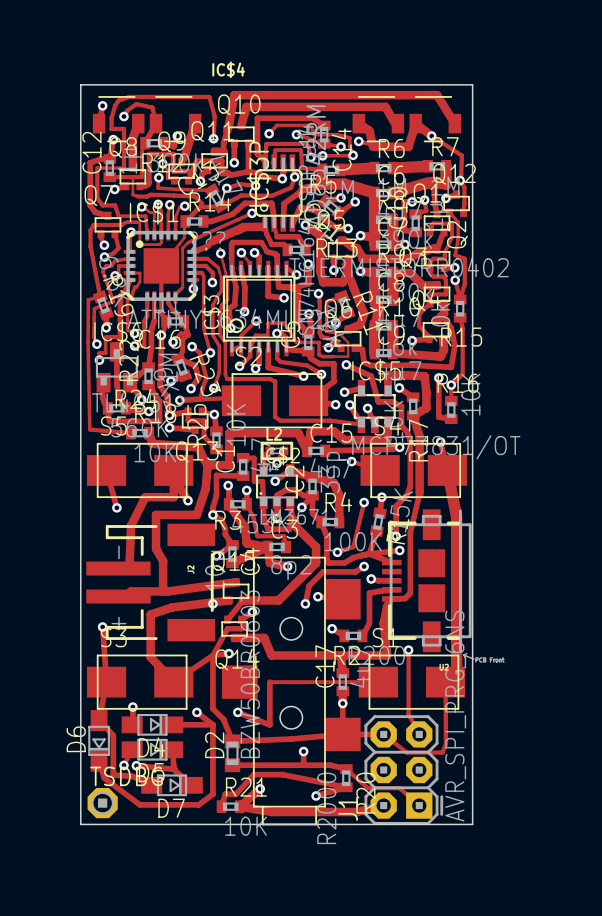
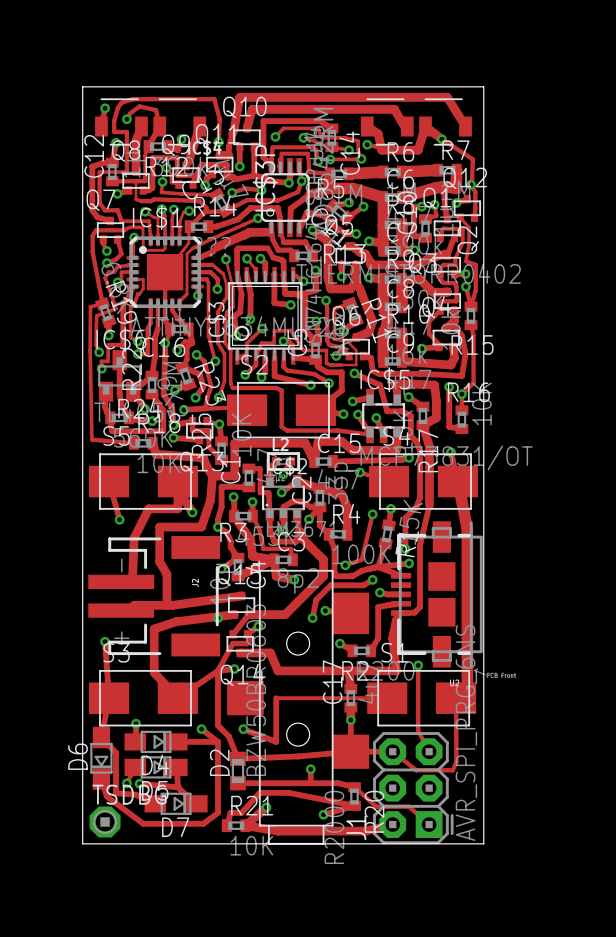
IC$4 position: (228, 69) -> (204, 147)

